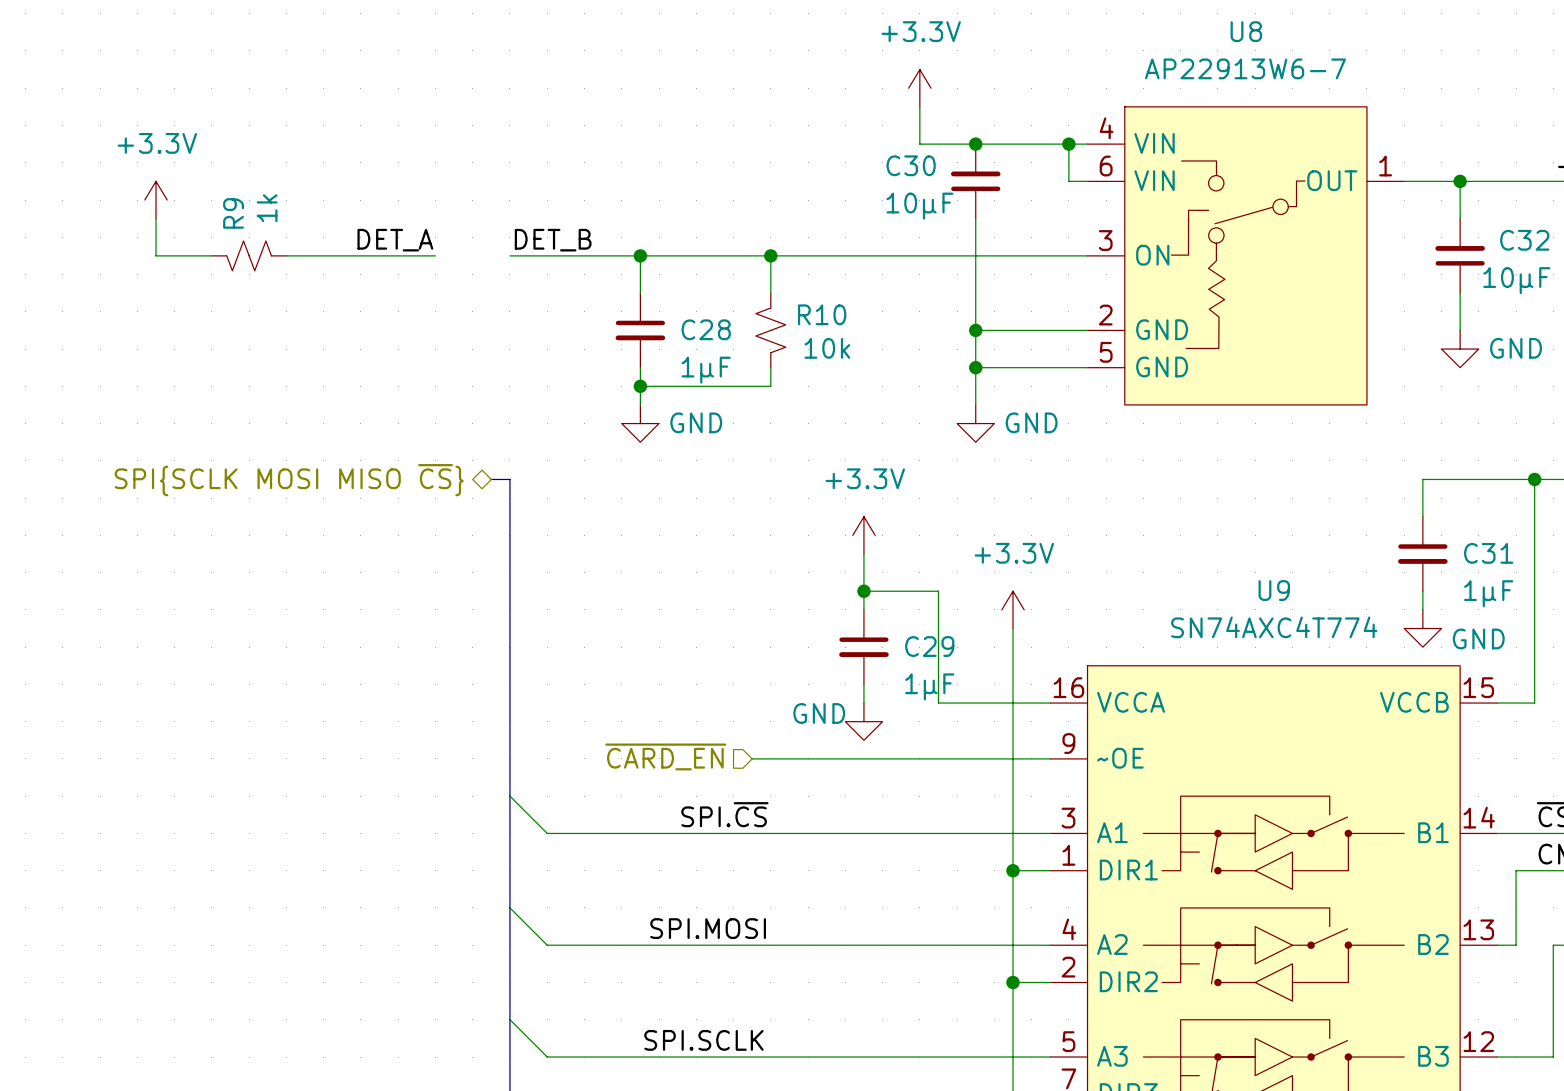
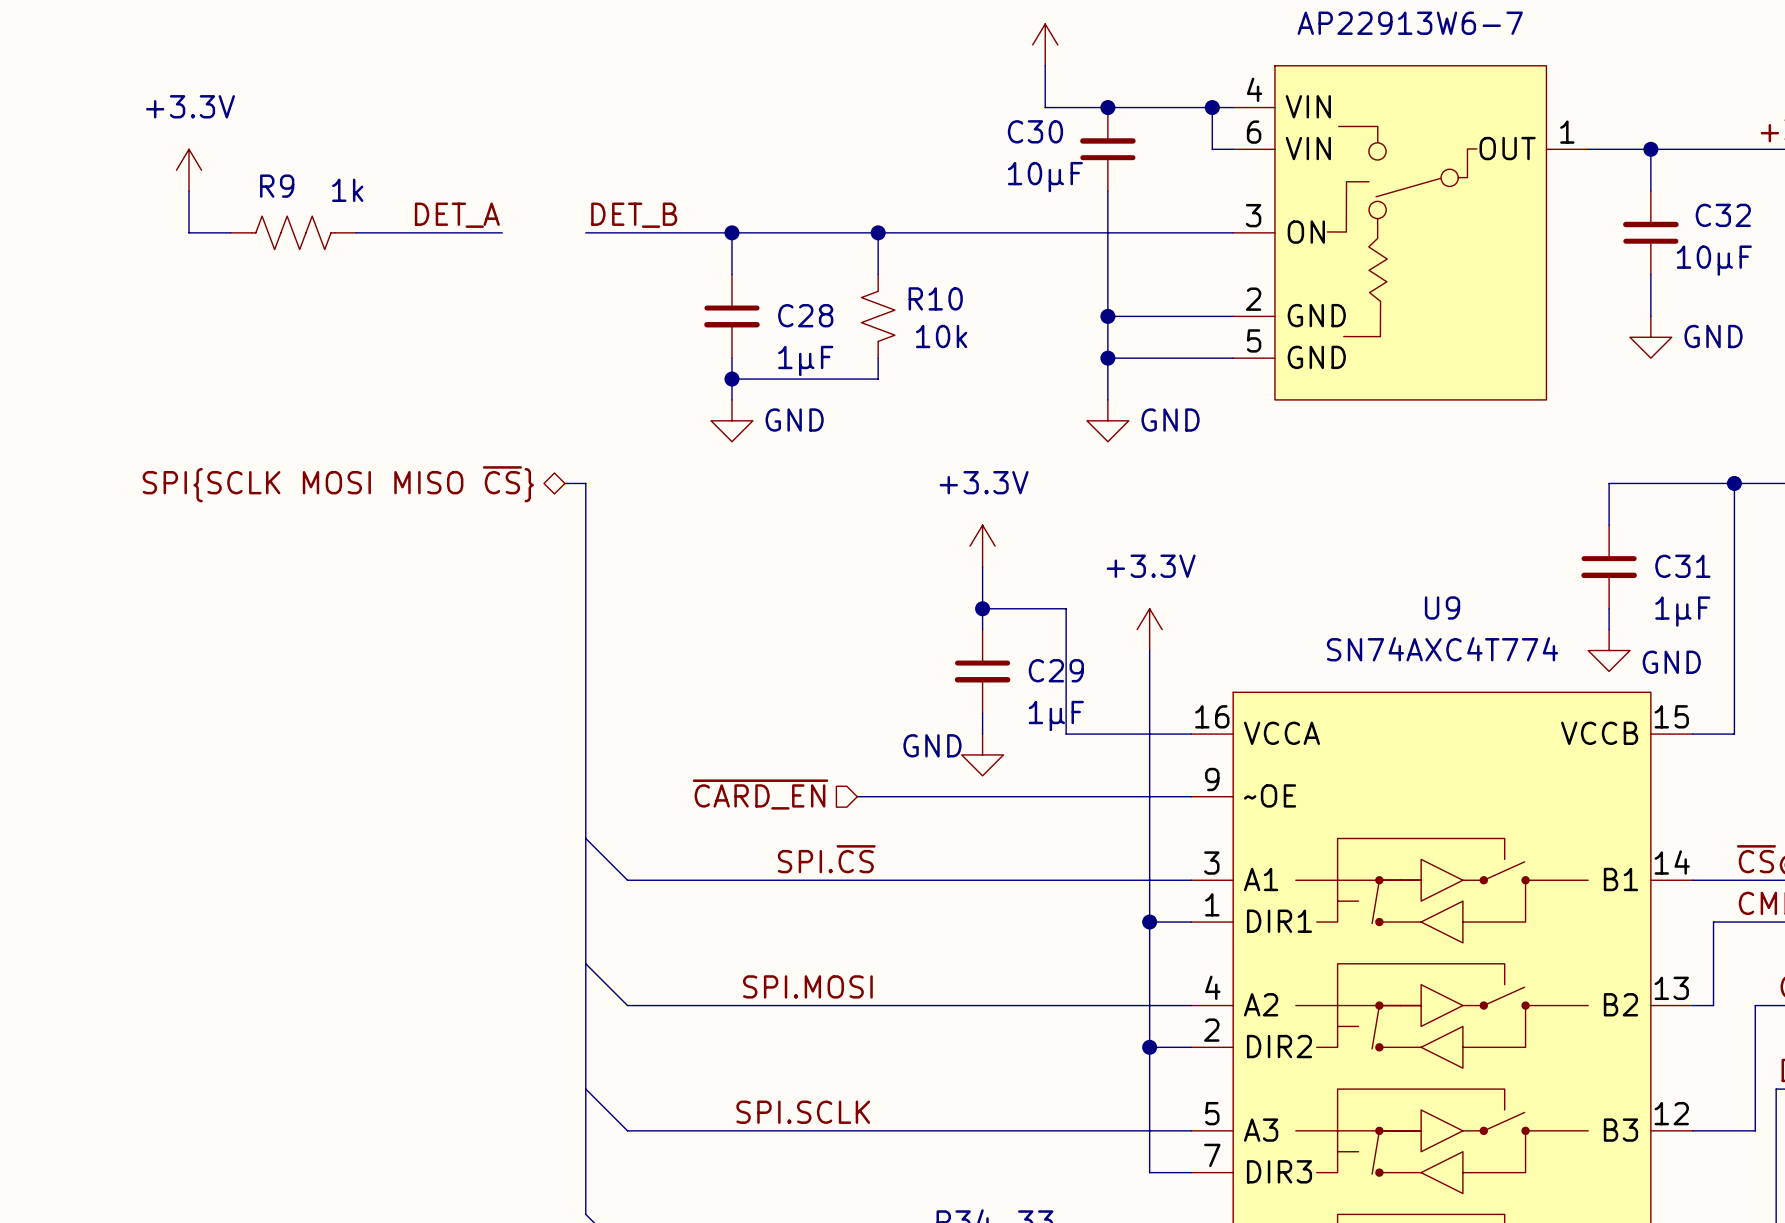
R9 value position: 1k (267, 208) -> 1k (347, 190)
R9 symbol: [211, 240, 287, 271] -> [230, 216, 357, 250]

